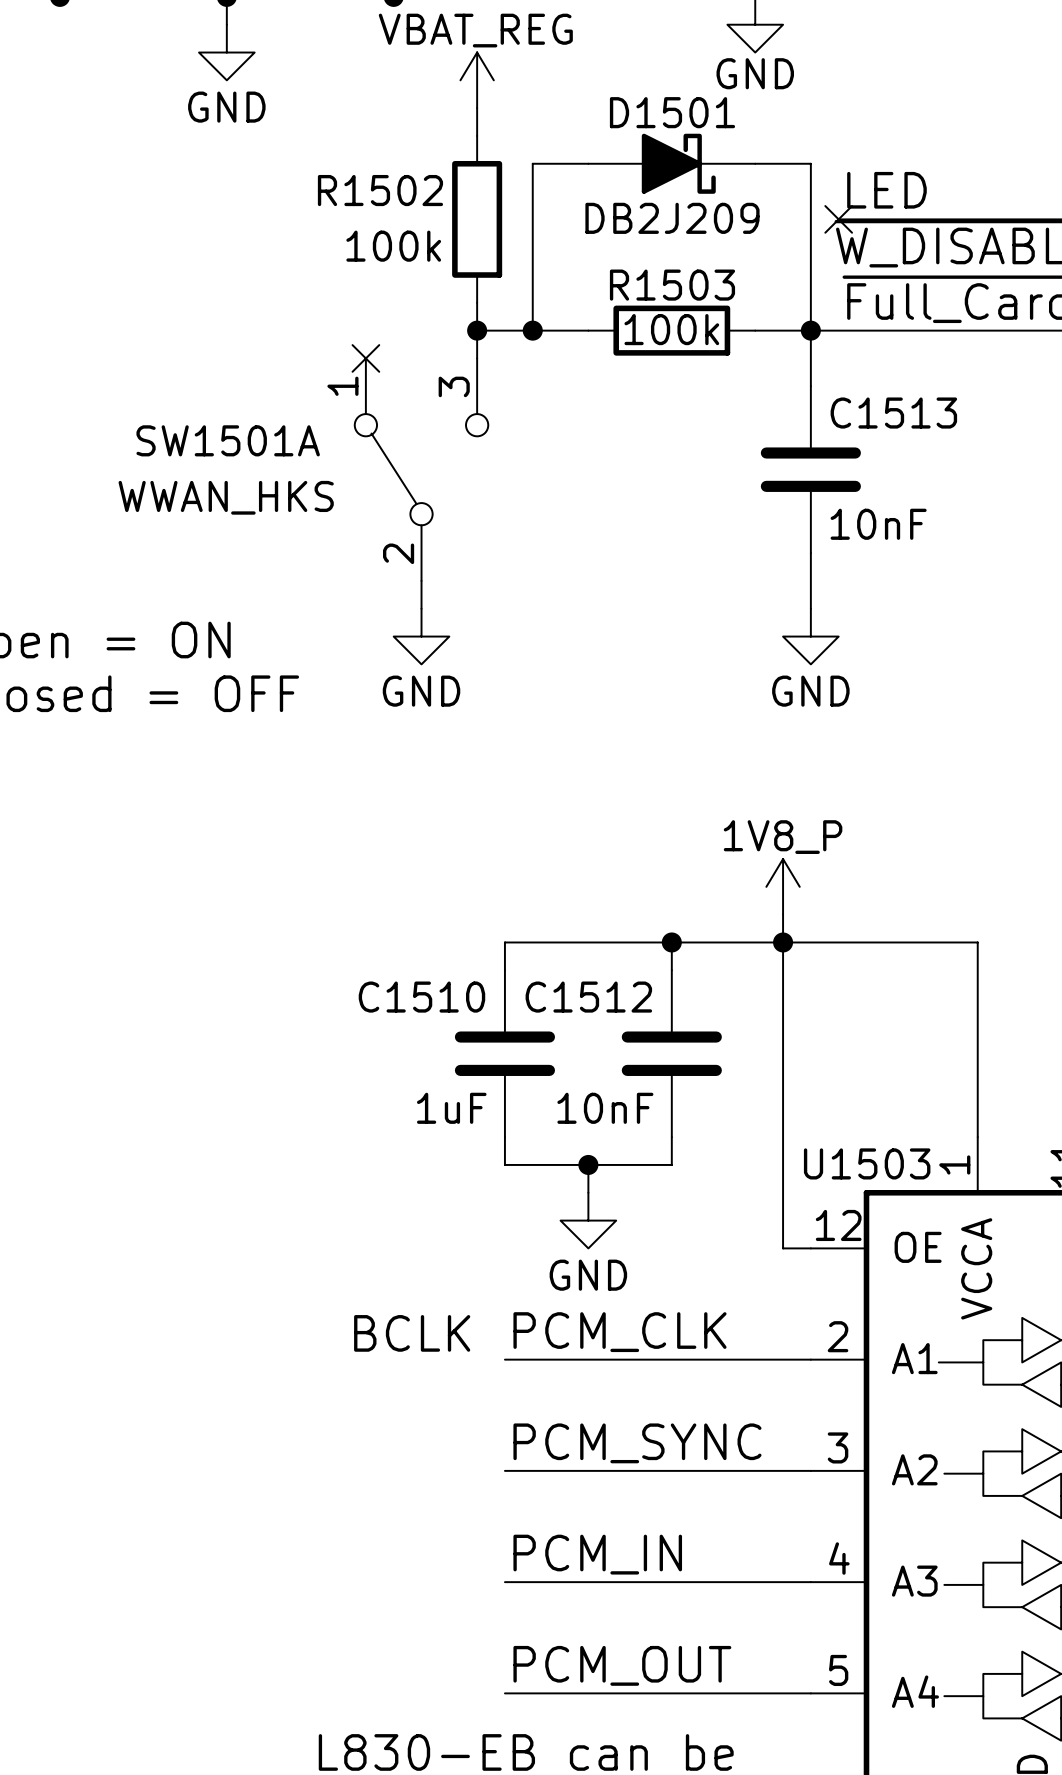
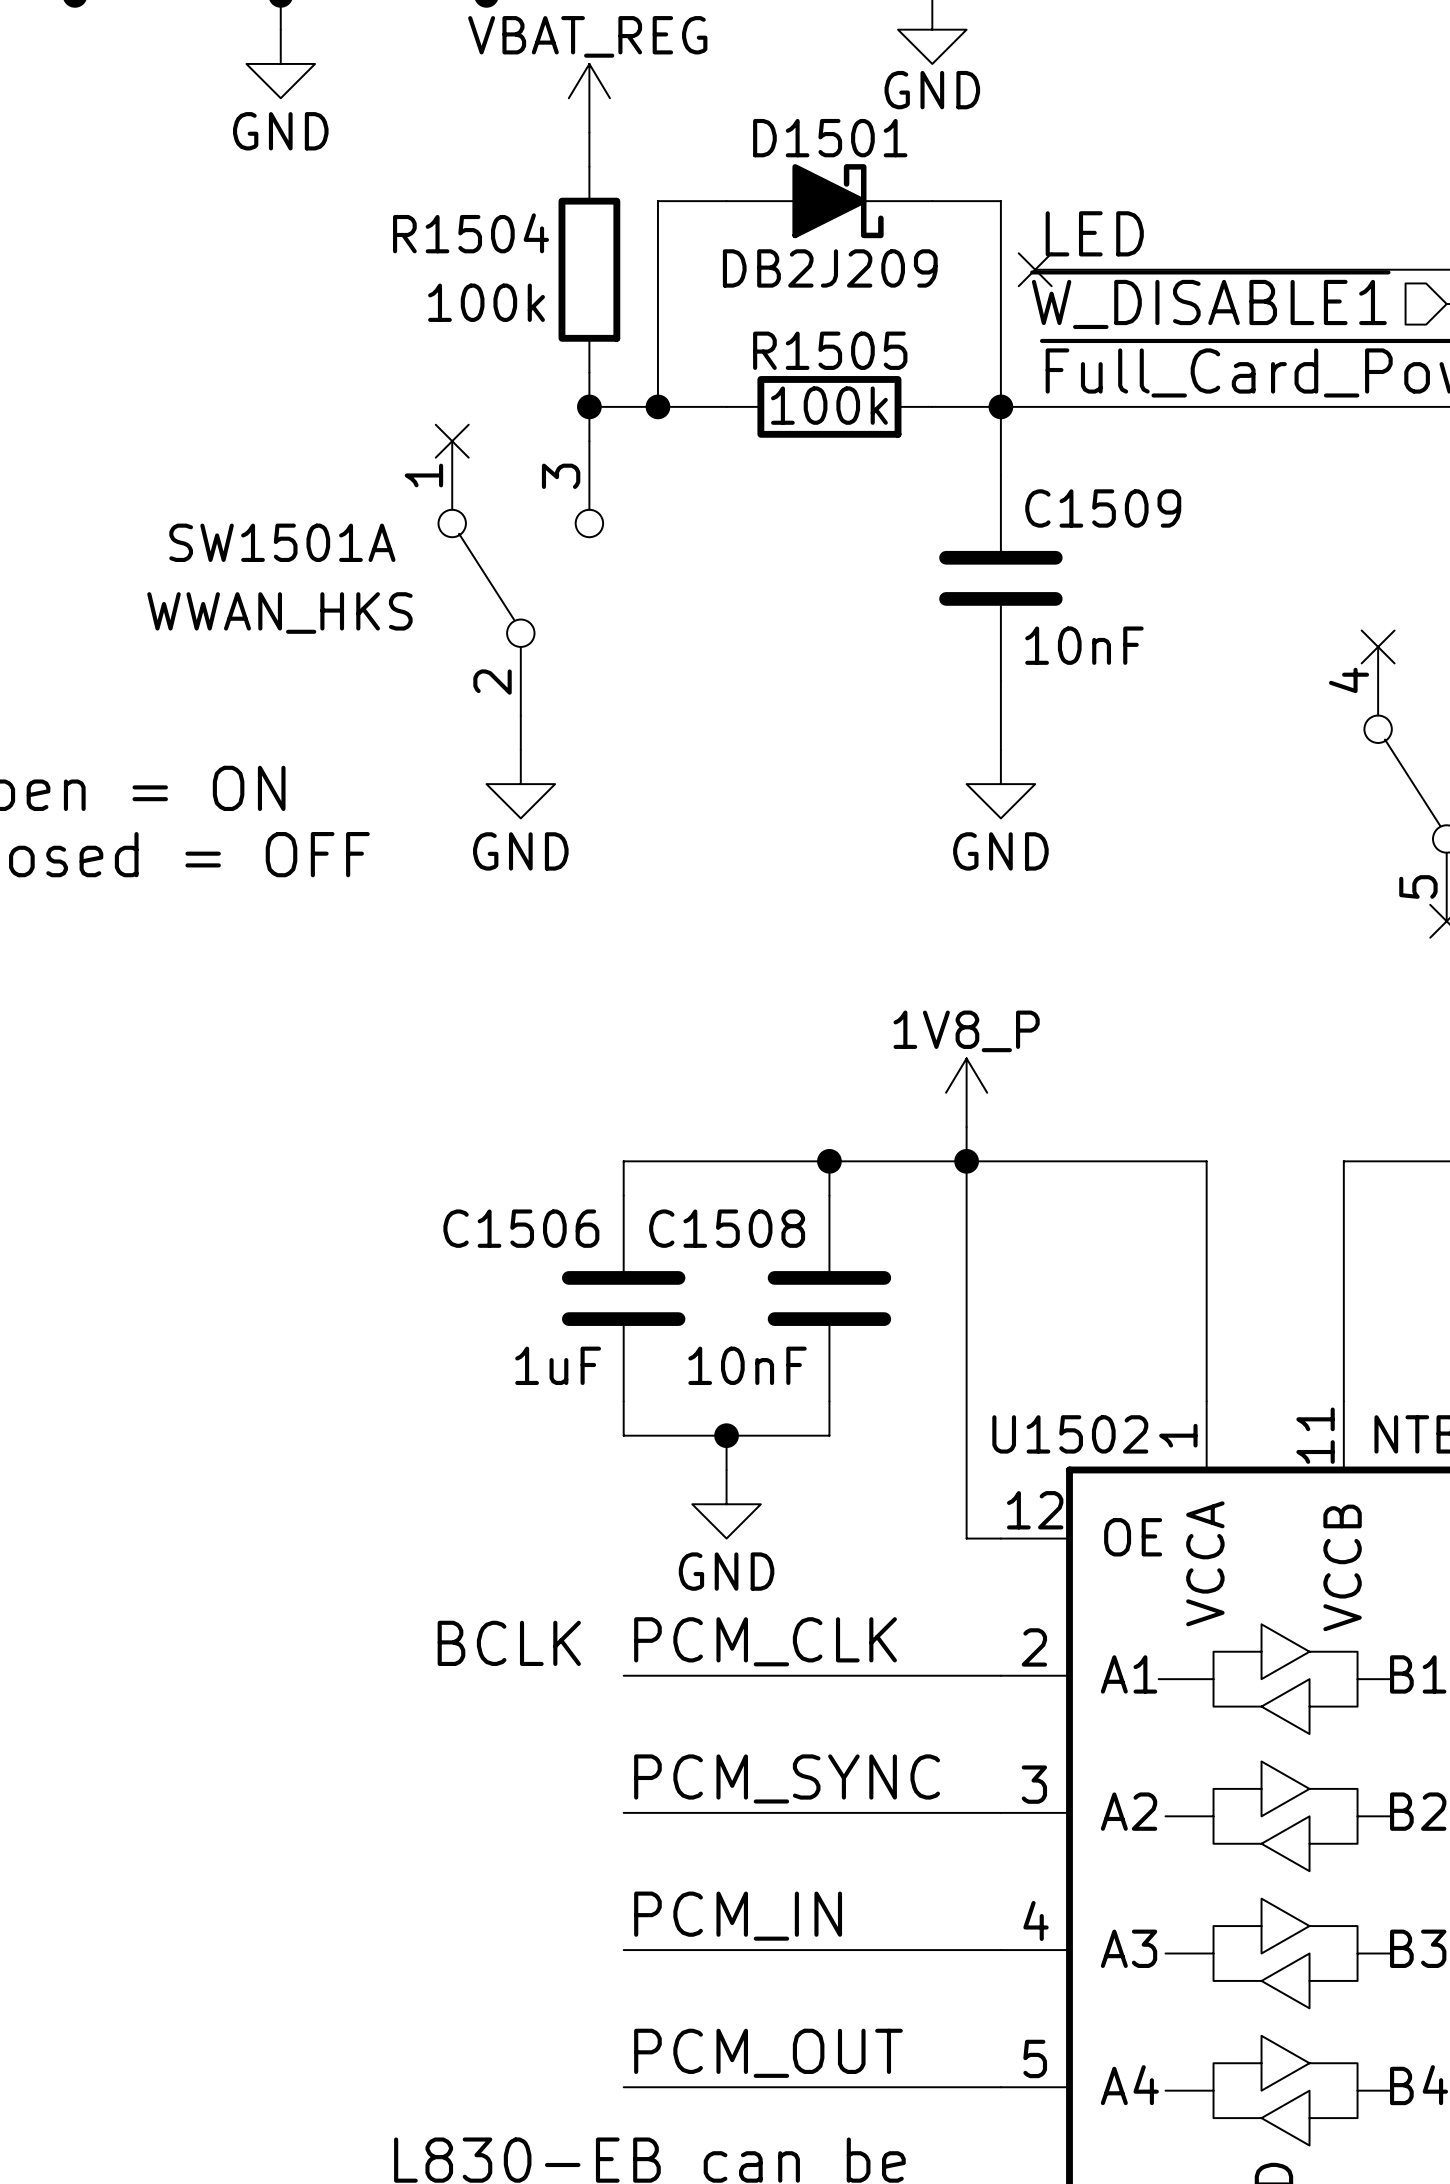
R1502 name: R1502 (380, 190) -> R1504 (471, 233)
R1503 name: R1503 (672, 285) -> R1505 (830, 350)
C1513 name: C1513 (893, 413) -> C1509 (1103, 508)
C1510 name: C1510 (421, 997) -> C1506 (521, 1228)
C1512 name: C1512 (588, 997) -> C1508 (727, 1228)
U1503 name: U1503 (867, 1163) -> U1502 (1070, 1434)

